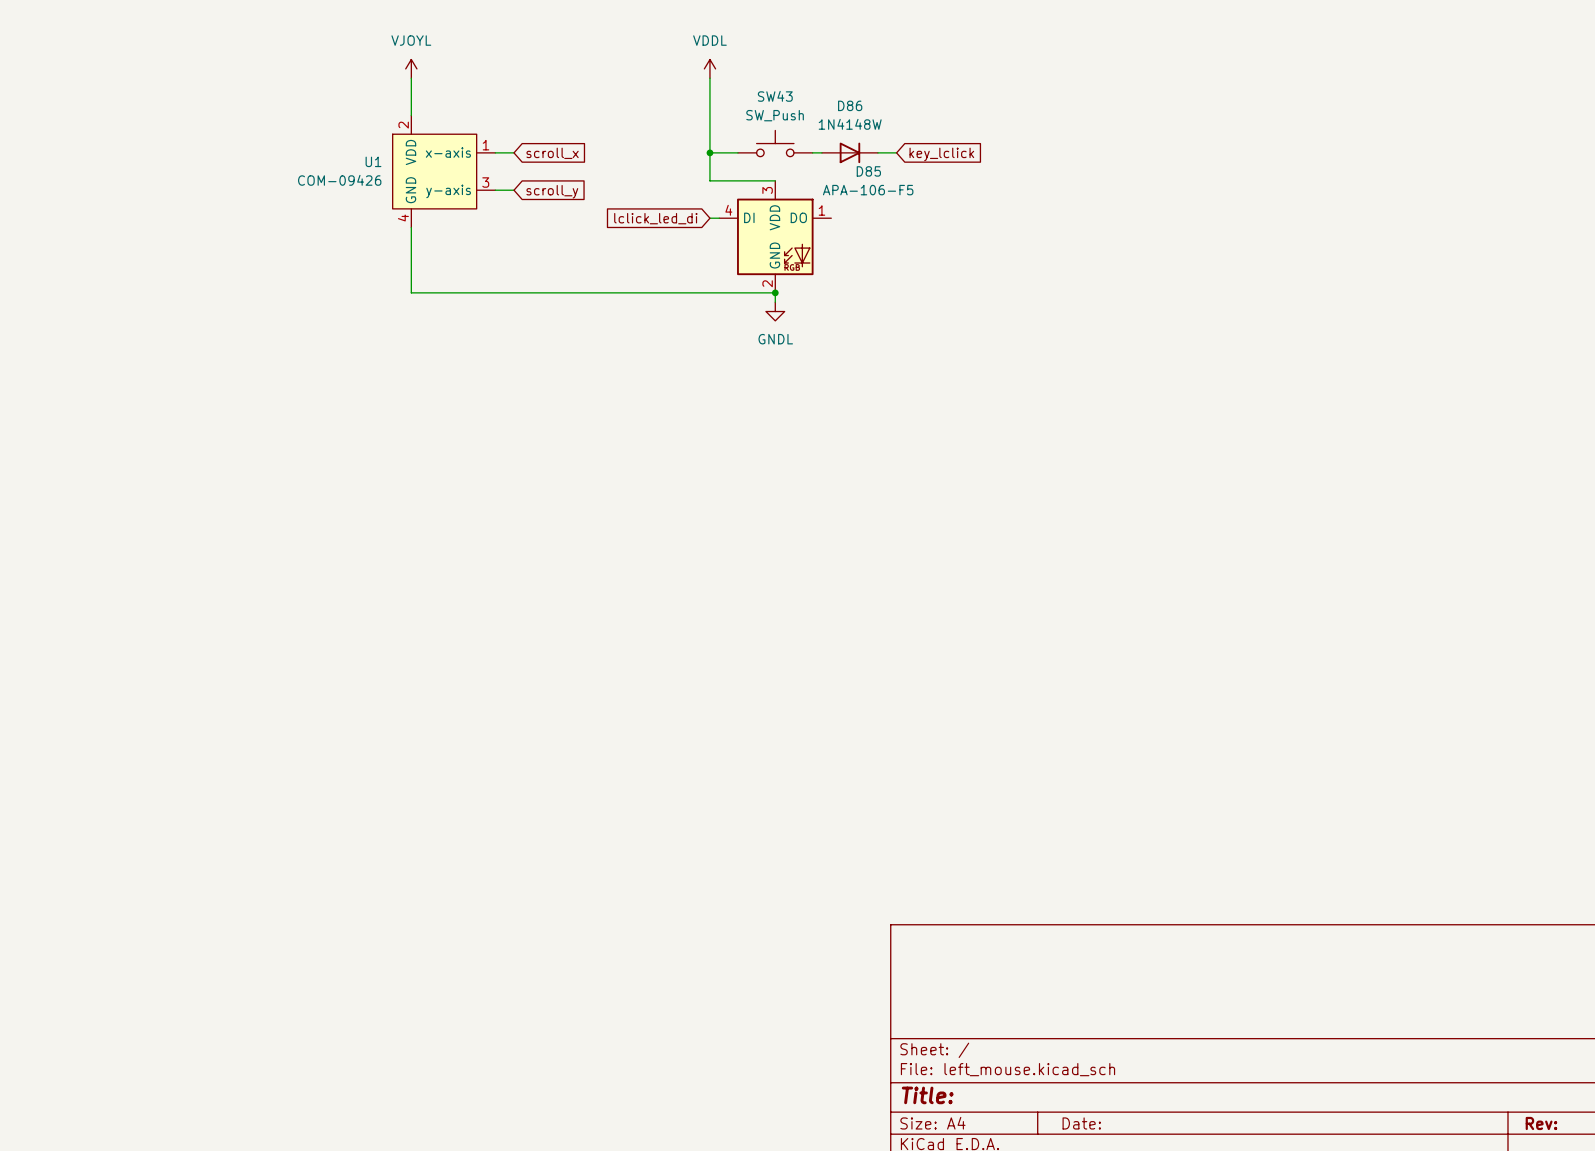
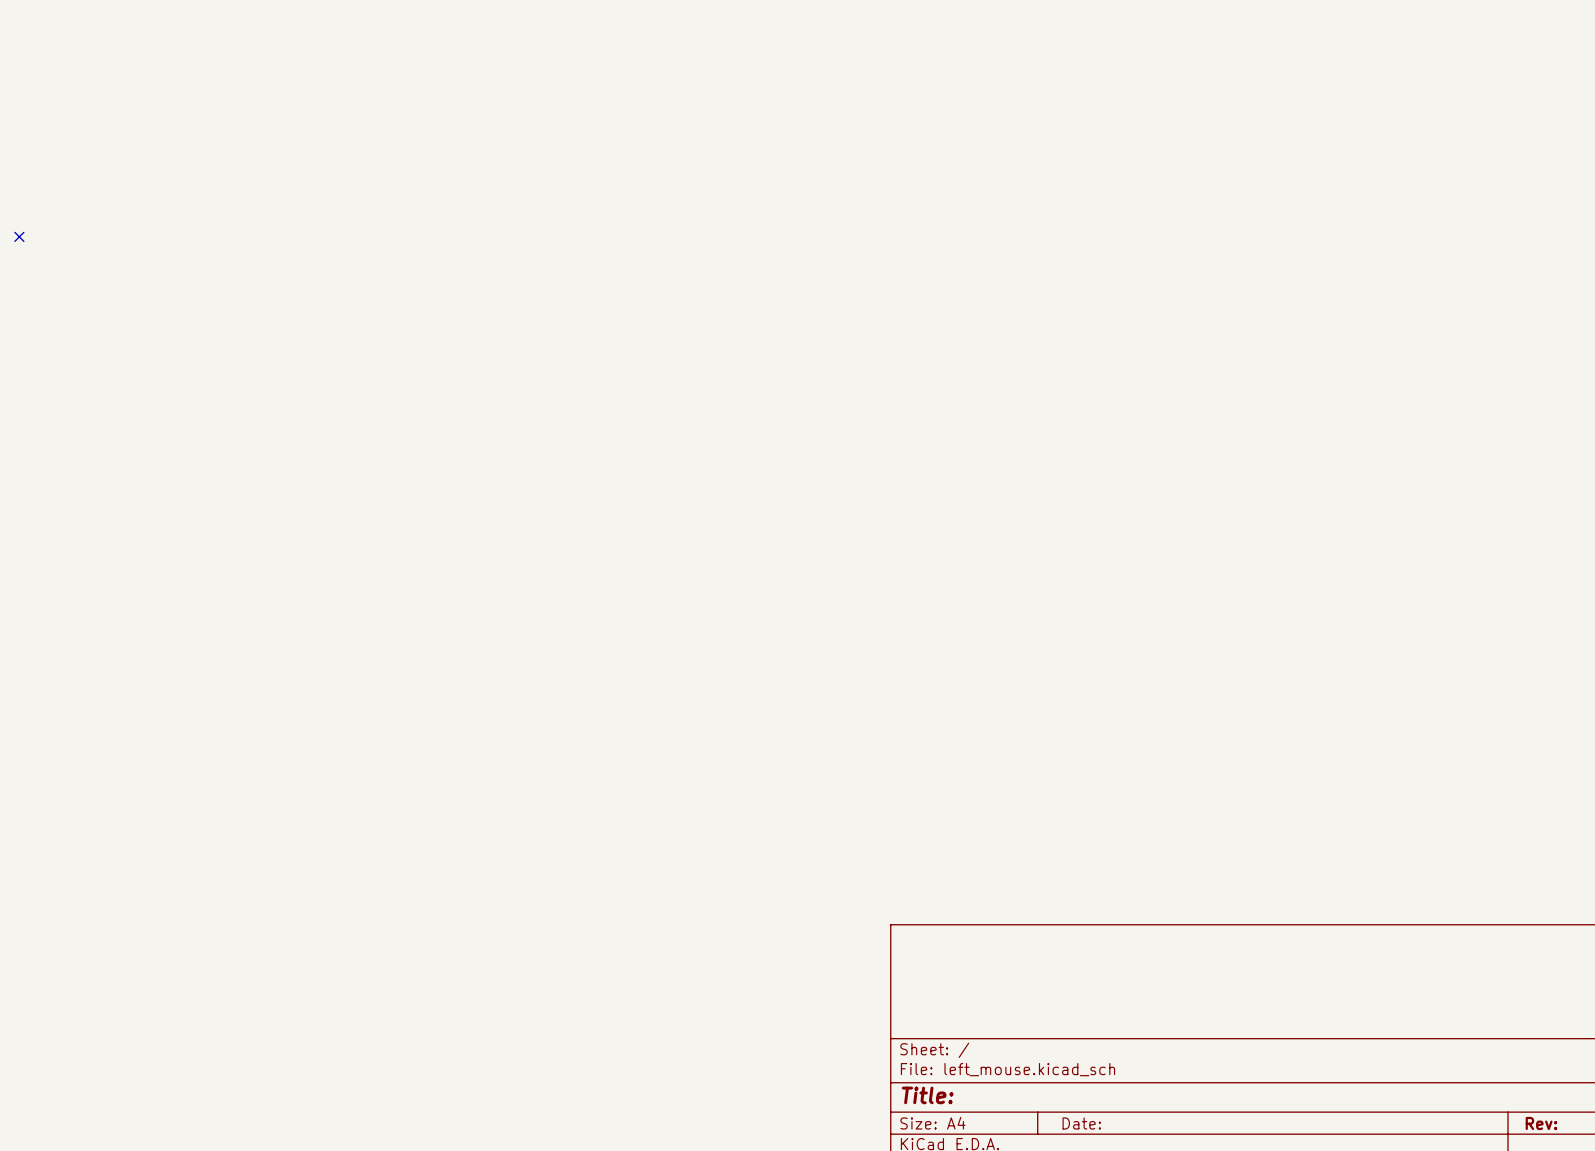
power symbol: VJOYL (411, 68) -> none
power symbol: VDDL (709, 68) -> none
wire: (411, 78) (411, 115) -> none
wire: (709, 78) (709, 180) (775, 180) -> none
SW43: SW_Push (775, 143) -> none
wire: (495, 152) (513, 152) -> none
wire: (709, 152) (737, 152) -> none
junction: (709, 152) -> none
wire: (812, 152) (821, 152) -> none
D86: 1N4148W (849, 152) -> none
wire: (877, 152) (896, 152) -> none
global label: scroll_x (552, 153) -> none
global label: key_lclick (941, 154) -> none
U1: COM-09426 (444, 171) -> none
wire: (495, 190) (513, 190) -> none
global label: scroll_y (552, 191) -> none
global label: lclick_led_di (655, 218) -> none
wire: (709, 218) (719, 218) -> none
wire: (411, 227) (411, 292) (775, 292) (775, 302) -> none
no-connect mark: none -> (19, 236)
D85: APA-106-F5 (775, 236) -> none
junction: (775, 292) -> none
power symbol: GNDL (775, 311) -> none

